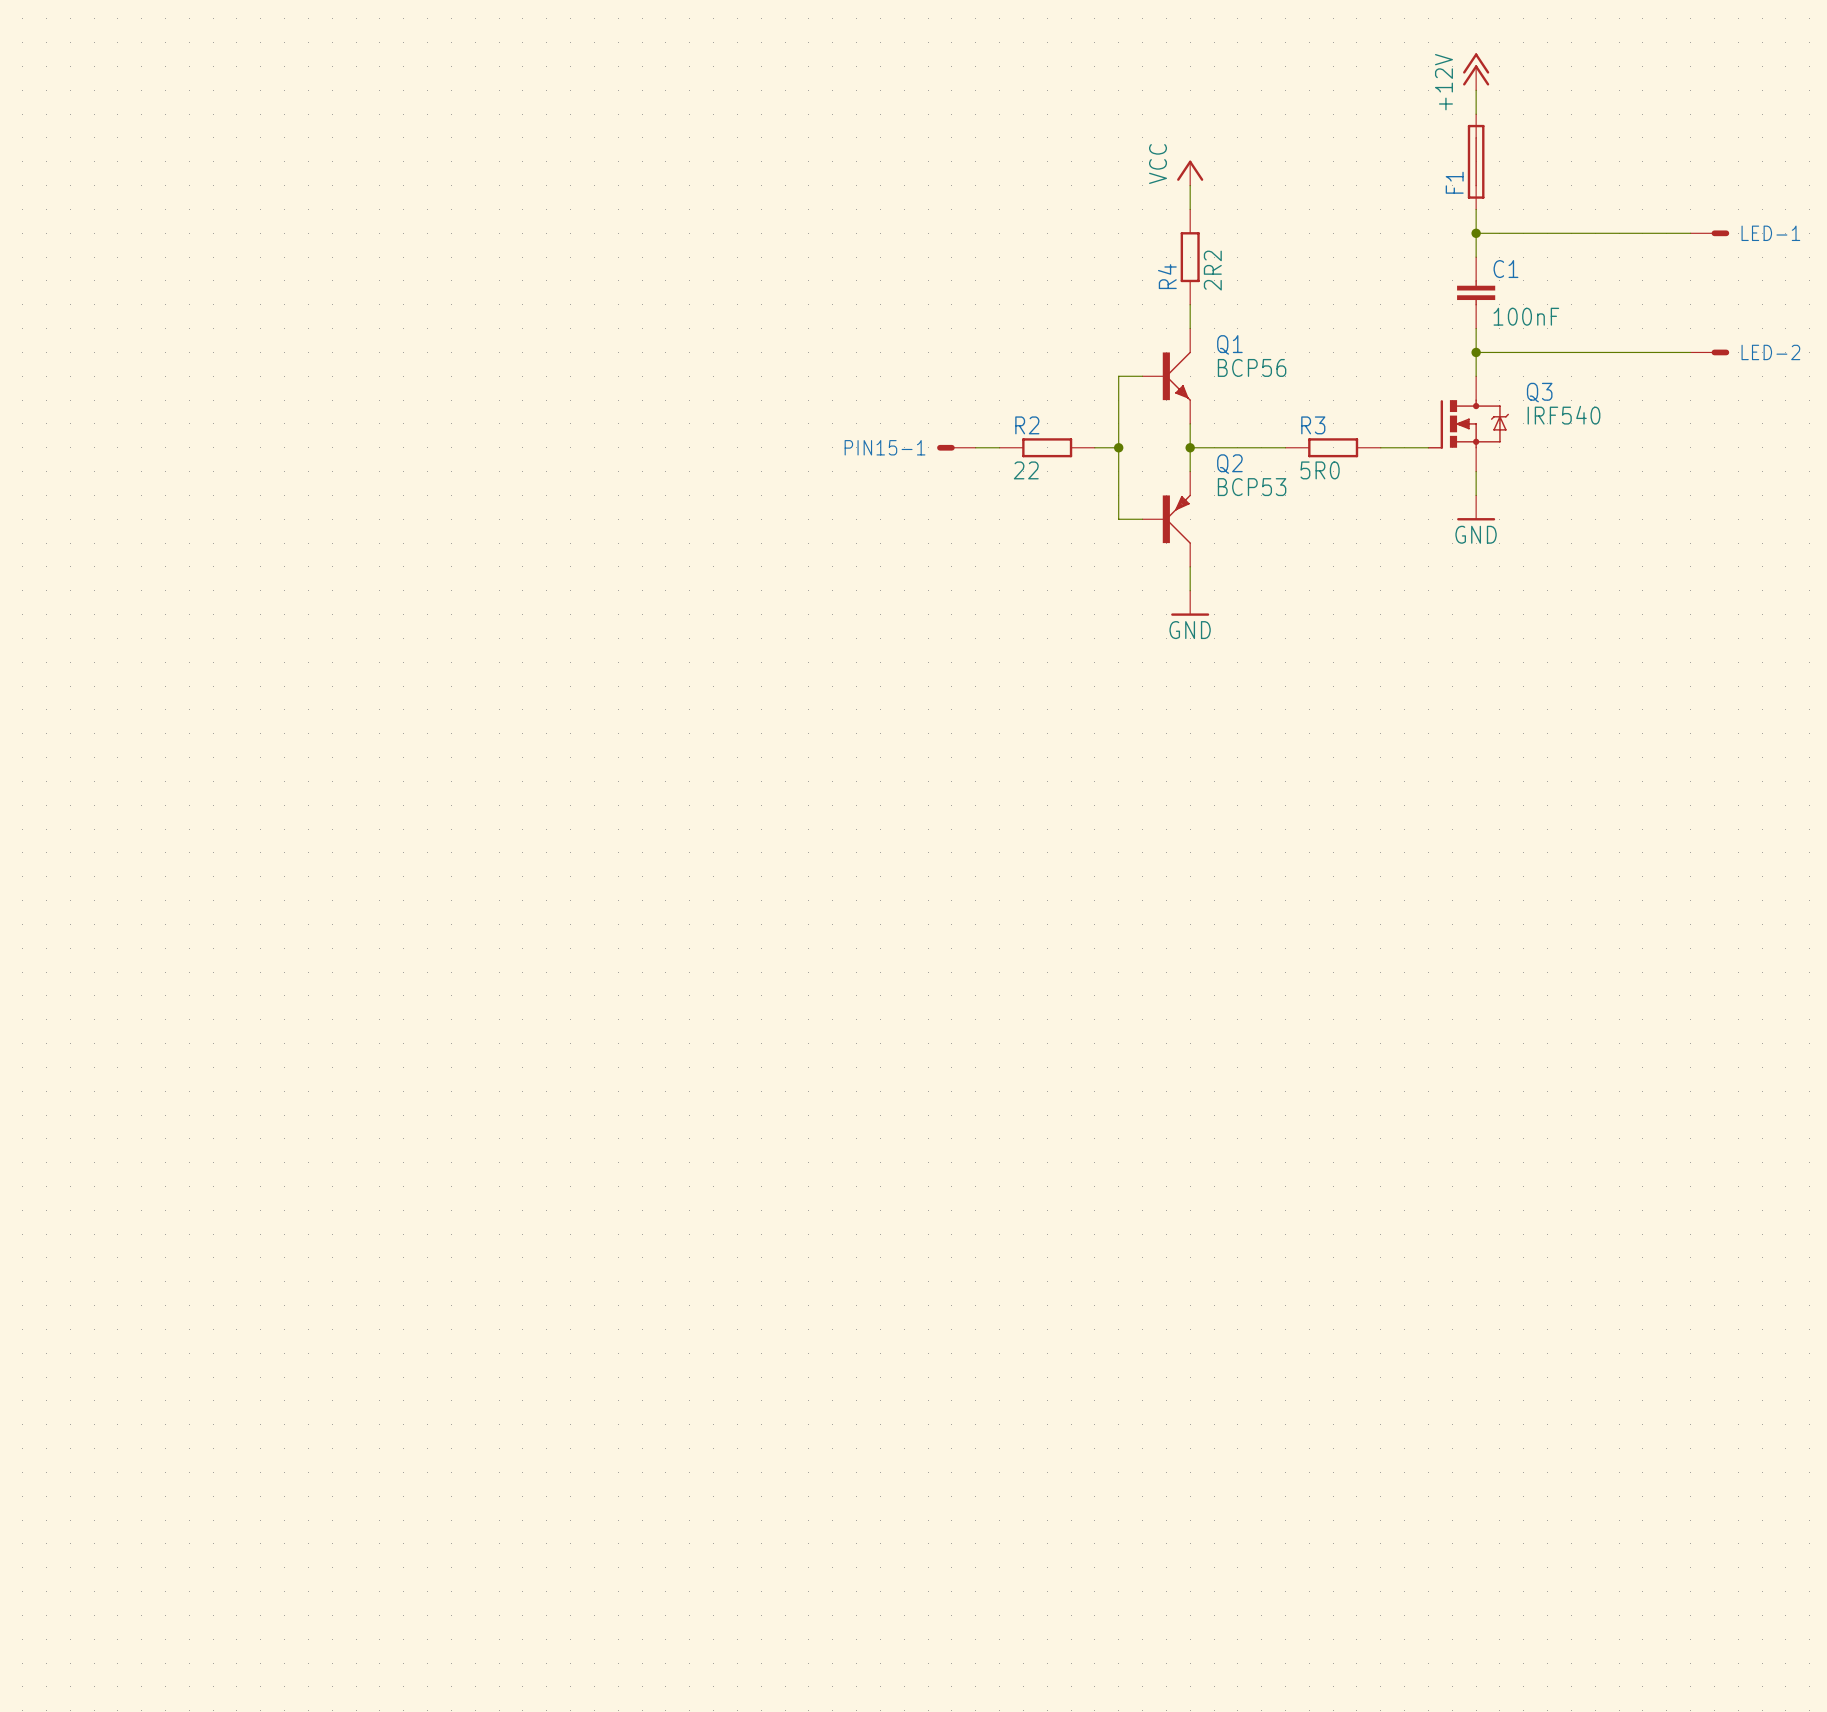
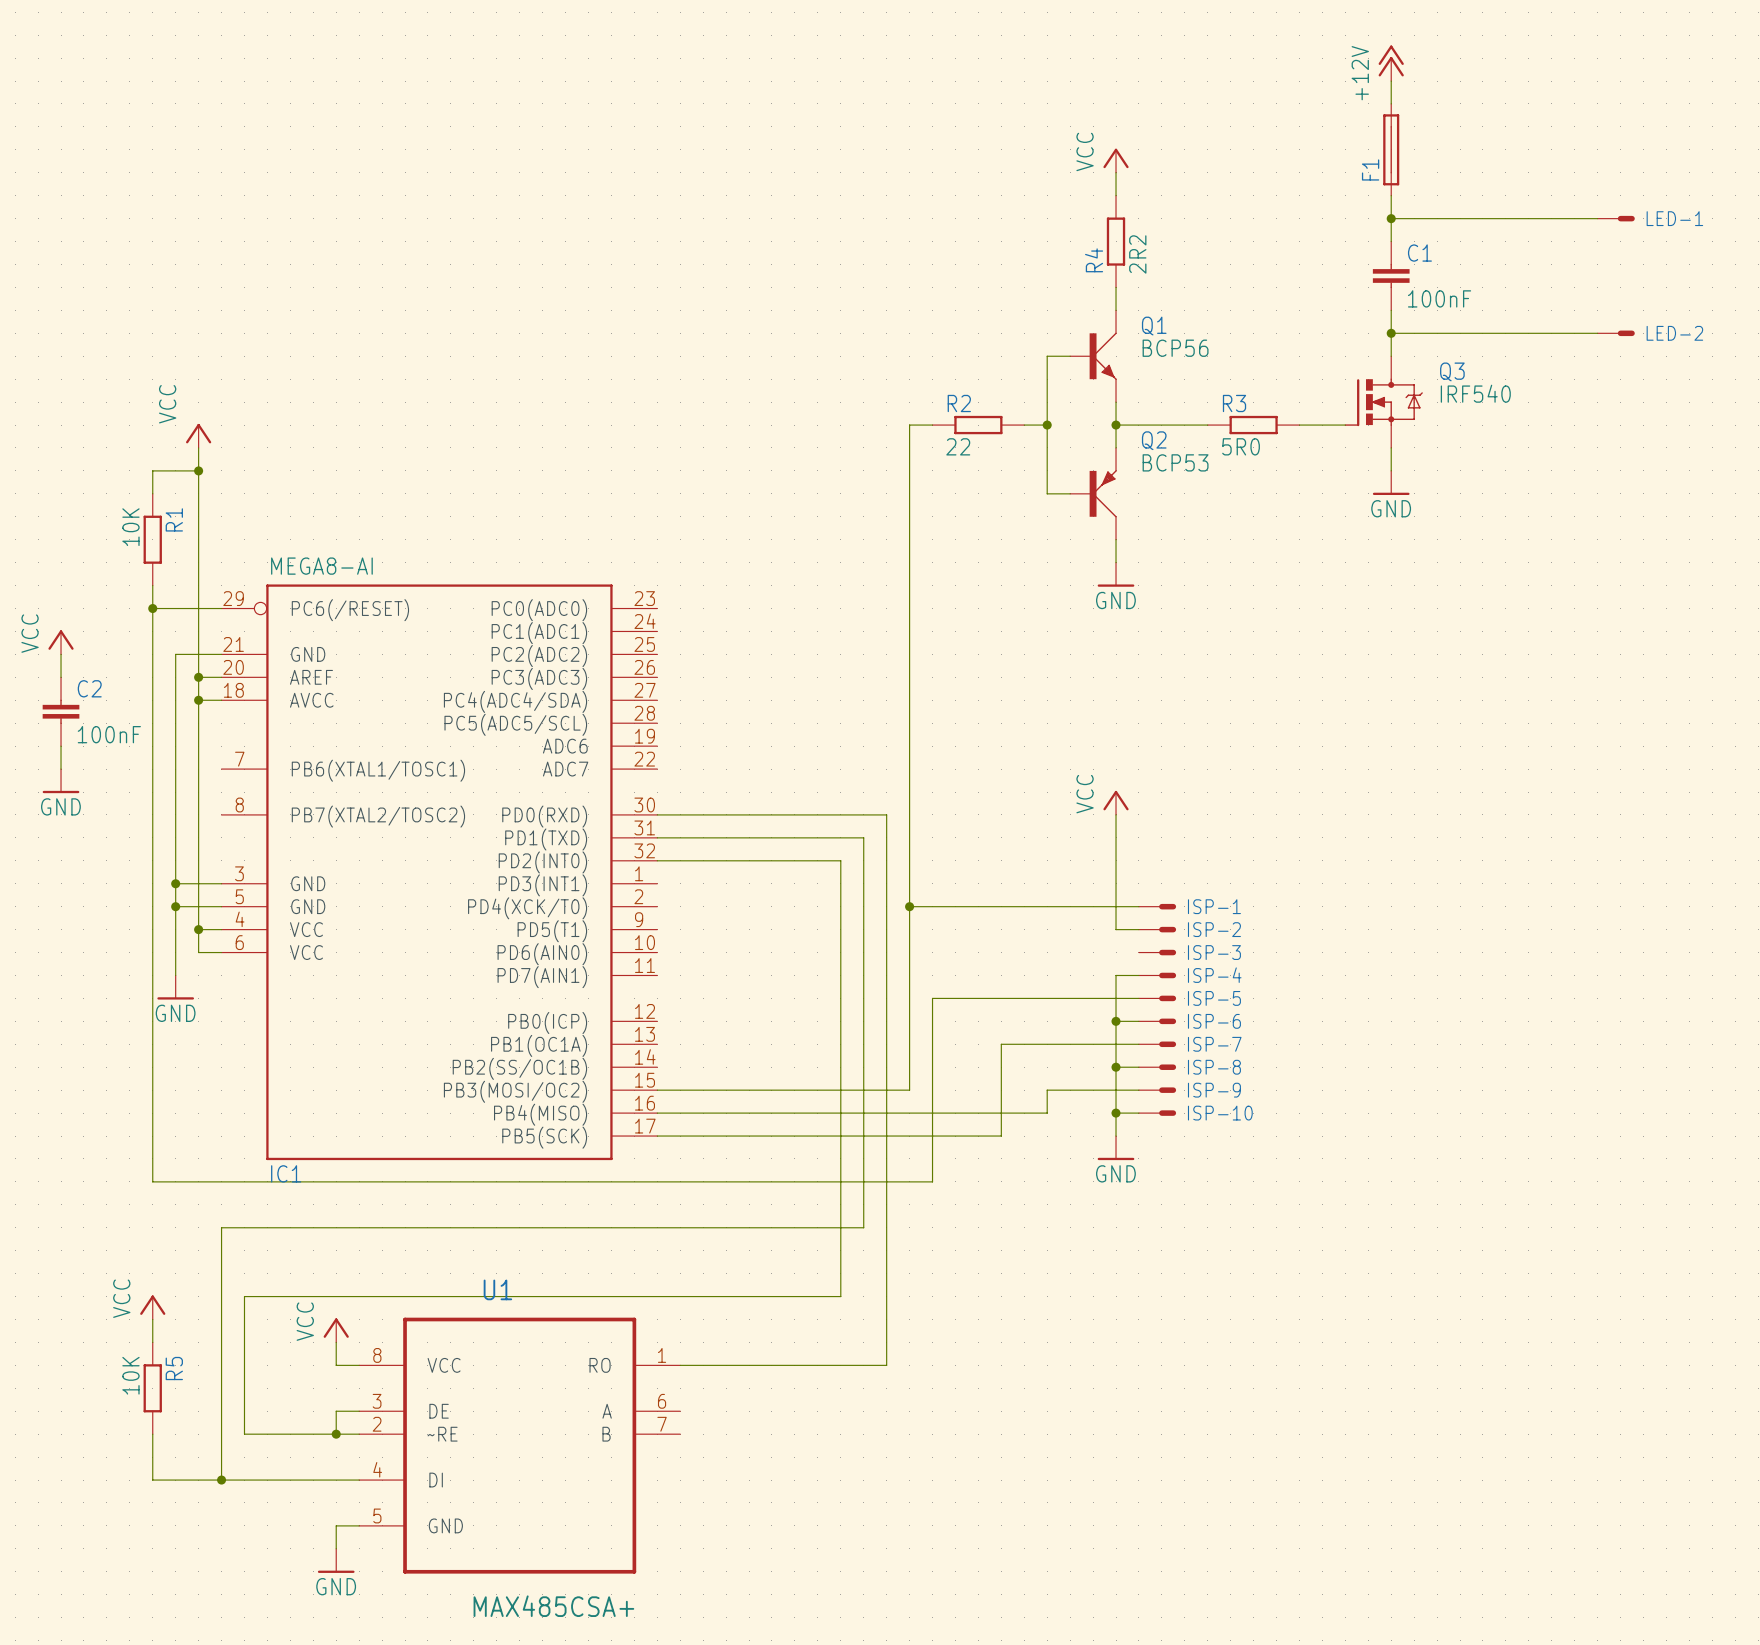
PIN15-1: (956, 447) -> none
wire: none -> (909, 425) (909, 1090) (657, 1090)
power symbol: none -> VCC (198, 435)
wire: none -> (198, 447) (198, 952) (221, 952)
wire: none -> (198, 470) (152, 470) (152, 493)
junction: none -> (198, 470)
R1: none -> 10K (152, 539)
wire: none -> (152, 585) (152, 1181) (932, 1181) (932, 998) (1138, 998)
wire: none -> (152, 608) (221, 608)
junction: none -> (152, 608)
power symbol: none -> VCC (61, 642)
wire: none -> (61, 654) (61, 677)
wire: none -> (221, 654) (175, 654) (175, 975)
wire: none -> (198, 677) (221, 677)
junction: none -> (198, 677)
wire: none -> (198, 700) (221, 700)
junction: none -> (198, 700)
C2: none -> 100nF (61, 711)
wire: none -> (61, 746) (61, 769)
power symbol: none -> GND (61, 781)
power symbol: none -> VCC (1116, 802)
wire: none -> (657, 814) (886, 814) (886, 1365) (680, 1365)
wire: none -> (1116, 814) (1116, 929) (1138, 929)
wire: none -> (657, 837) (863, 837) (863, 1227) (221, 1227) (221, 1480)
wire: none -> (657, 860) (840, 860) (840, 1296) (244, 1296) (244, 1434) (359, 1434)
IC1: none -> MEGA8-AI (439, 872)
wire: none -> (175, 883) (221, 883)
junction: none -> (175, 883)
wire: none -> (175, 906) (221, 906)
junction: none -> (175, 906)
wire: none -> (909, 906) (1138, 906)
junction: none -> (909, 906)
ISP-1: none -> (1157, 906)
wire: none -> (198, 929) (221, 929)
junction: none -> (198, 929)
ISP-2: none -> (1157, 929)
ISP-3: none -> (1157, 952)
wire: none -> (1138, 975) (1116, 975) (1116, 1136)
ISP-4: none -> (1157, 975)
power symbol: none -> GND (175, 987)
ISP-5: none -> (1157, 998)
wire: none -> (1116, 1021) (1138, 1021)
junction: none -> (1116, 1021)
ISP-6: none -> (1157, 1021)
wire: none -> (1138, 1044) (1001, 1044) (1001, 1136) (657, 1136)
ISP-7: none -> (1157, 1044)
wire: none -> (1116, 1067) (1138, 1067)
junction: none -> (1116, 1067)
ISP-8: none -> (1157, 1067)
wire: none -> (1138, 1090) (1047, 1090) (1047, 1113) (657, 1113)
ISP-9: none -> (1157, 1090)
wire: none -> (1116, 1113) (1138, 1113)
junction: none -> (1116, 1113)
ISP-10: none -> (1157, 1113)
power symbol: none -> GND (1116, 1148)
power symbol: none -> VCC (152, 1307)
wire: none -> (152, 1319) (152, 1342)
power symbol: none -> VCC (336, 1330)
wire: none -> (336, 1342) (336, 1365) (359, 1365)
R5: none -> 10K (152, 1388)
wire: none -> (359, 1411) (336, 1411) (336, 1434)
wire: none -> (152, 1434) (152, 1480) (359, 1480)
junction: none -> (336, 1434)
U1: none -> MAX485CSA+ (519, 1445)
junction: none -> (221, 1480)
wire: none -> (359, 1525) (336, 1525) (336, 1548)
power symbol: none -> GND (336, 1560)

